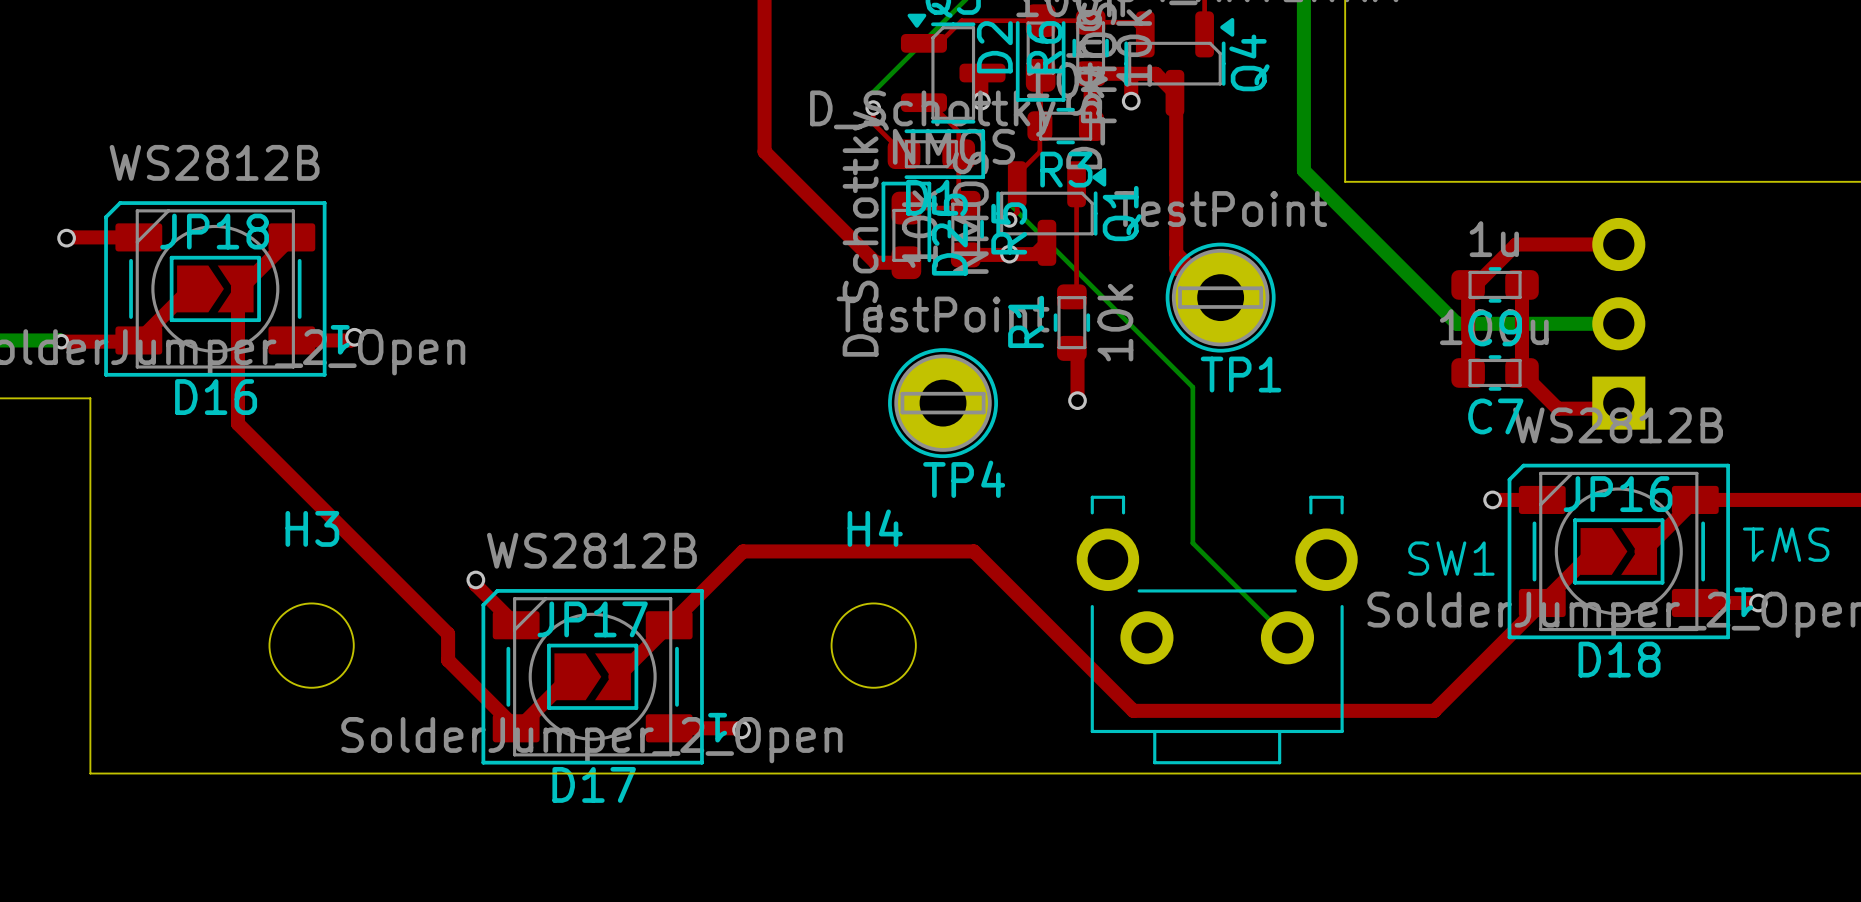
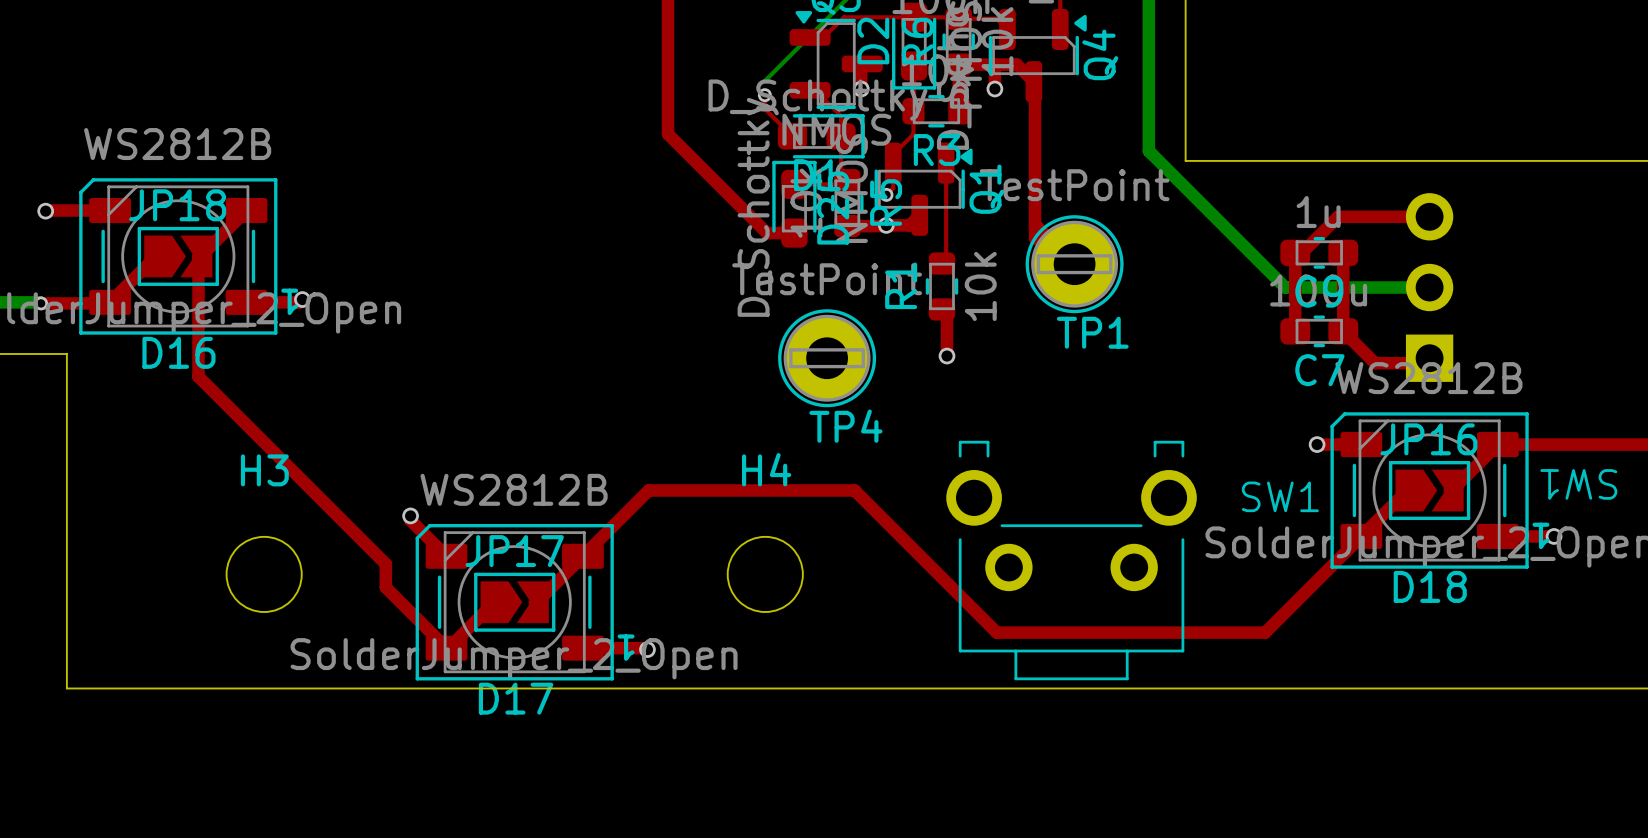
bottom track: (1009, 204) (1192, 387) (1192, 543) (1287, 637) -> none

